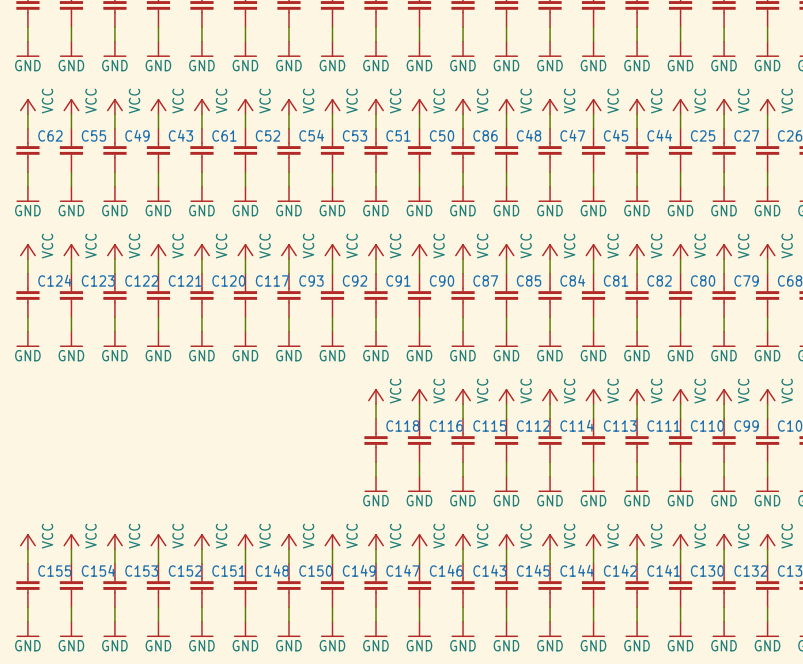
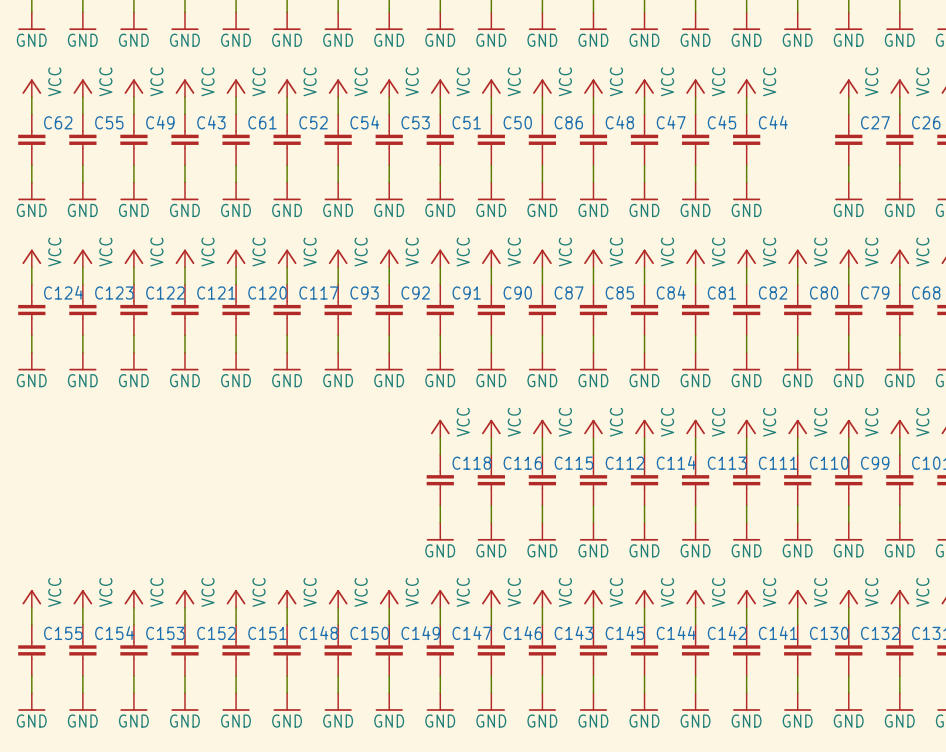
power symbol: VCC (680, 106) -> none
wire: (680, 114) (680, 128) -> none
C25: (680, 150) -> none
wire: (680, 172) (680, 186) -> none
power symbol: GND (680, 194) -> none

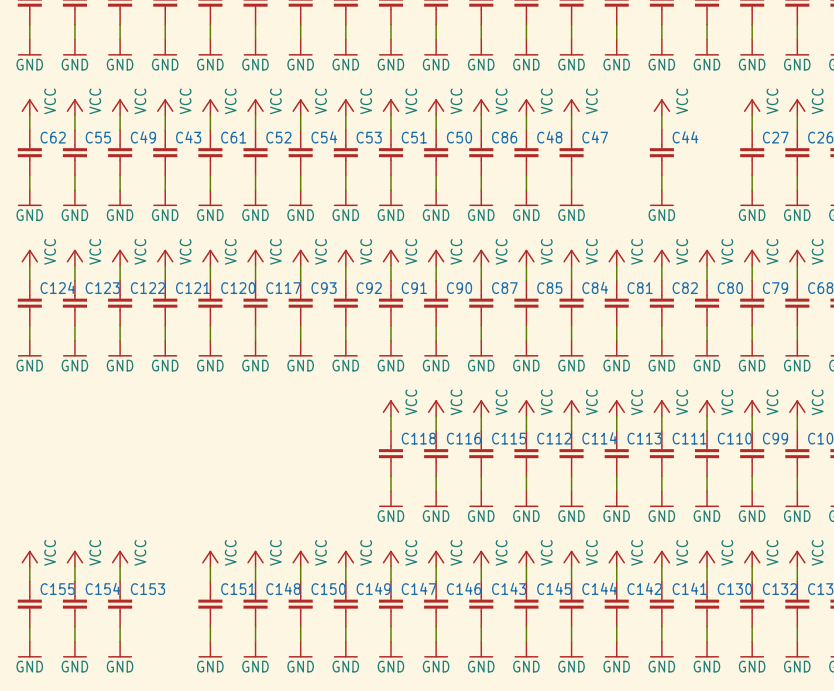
power symbol: VCC (695, 88) -> none
wire: (695, 97) (695, 114) -> none
C45: (695, 139) -> none
wire: (695, 165) (695, 182) -> none
power symbol: GND (695, 191) -> none
power symbol: VCC (184, 598) -> none
wire: (184, 607) (184, 624) -> none
C152: (184, 650) -> none
wire: (184, 675) (184, 692) -> none
power symbol: GND (184, 701) -> none

